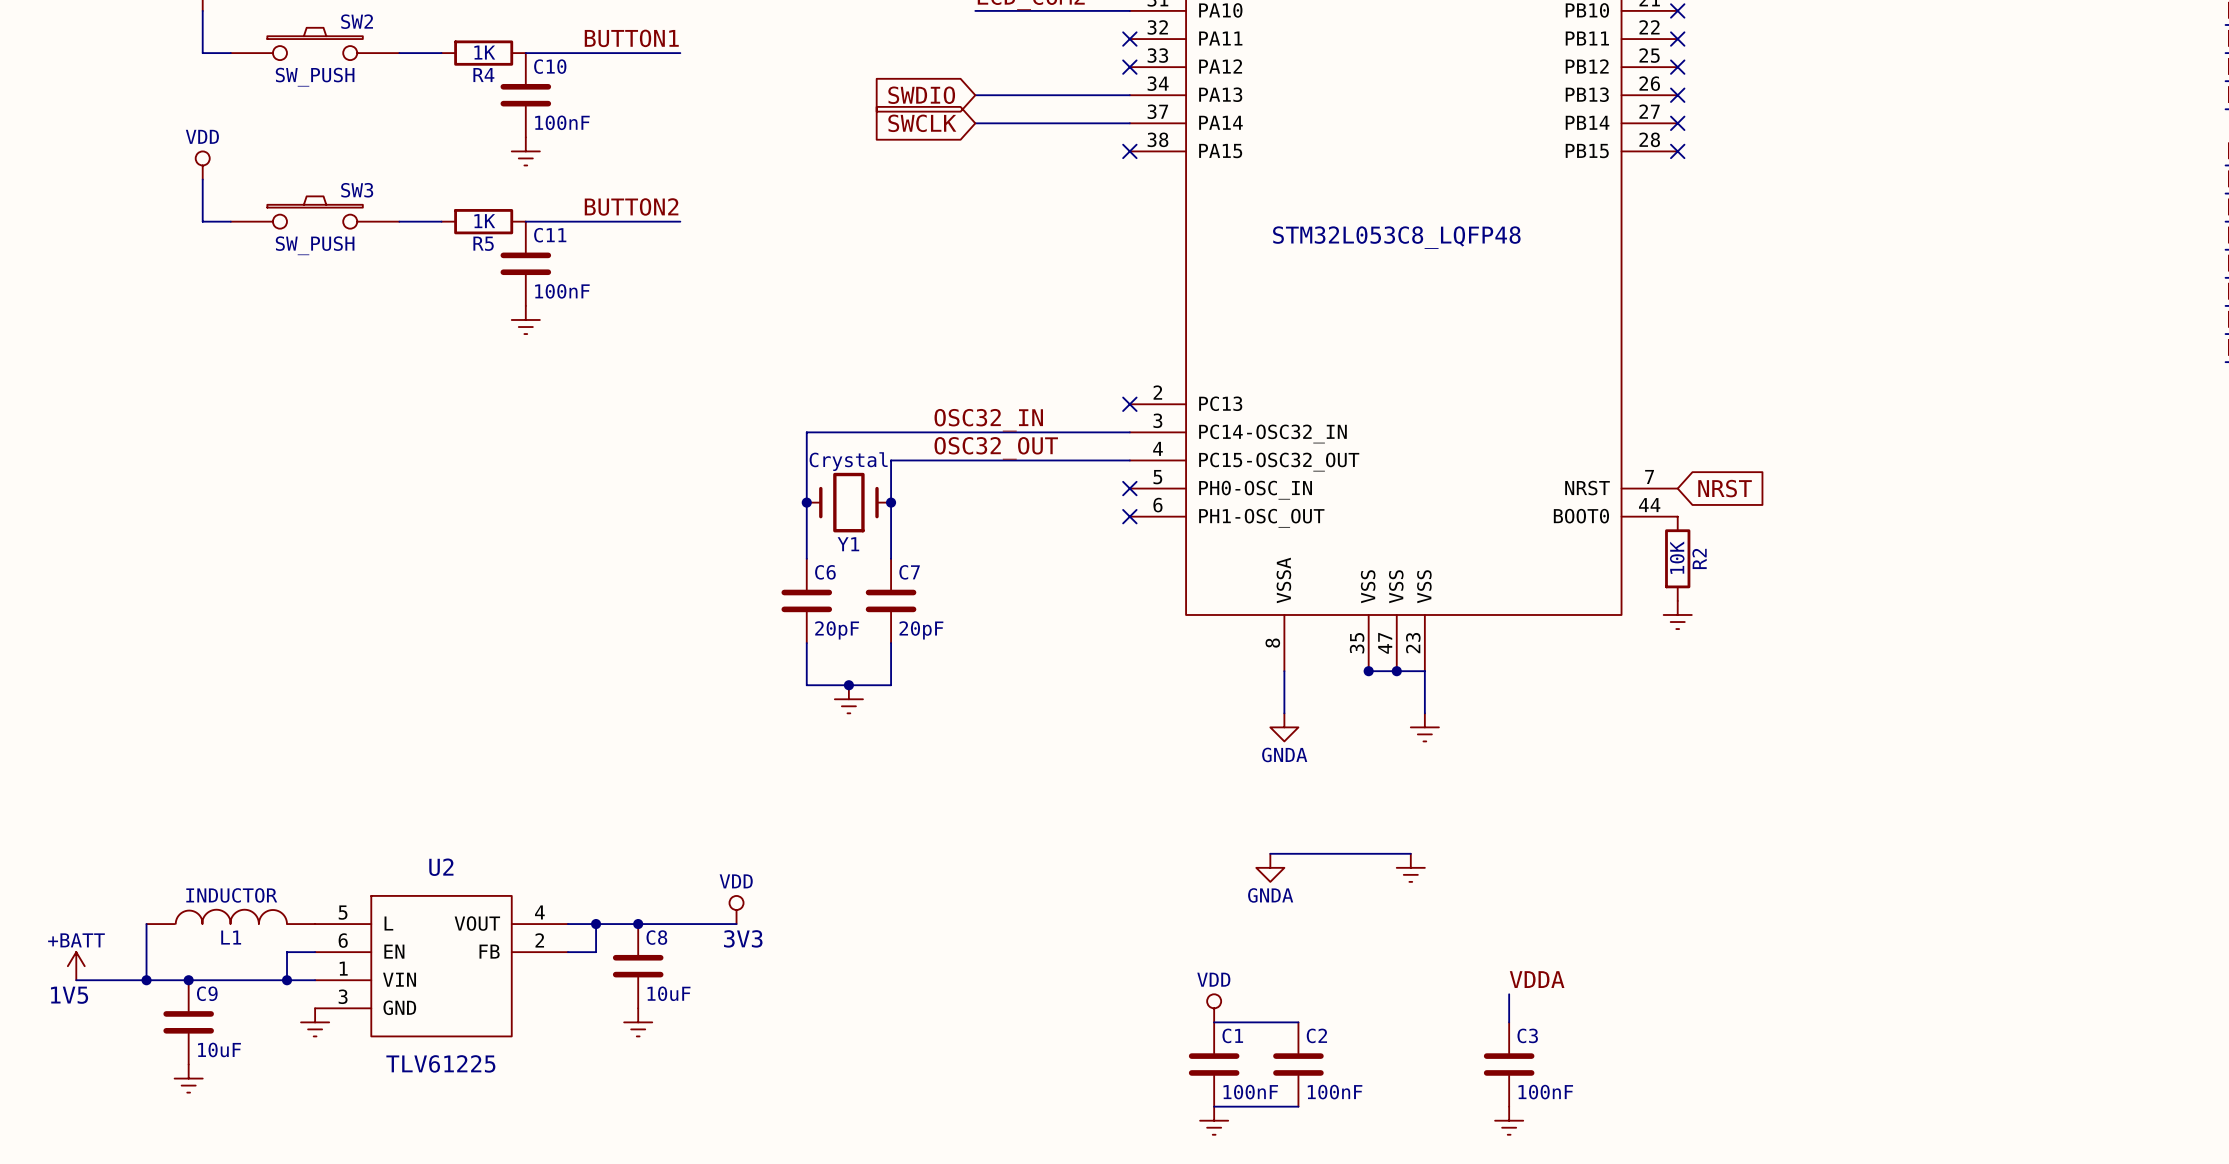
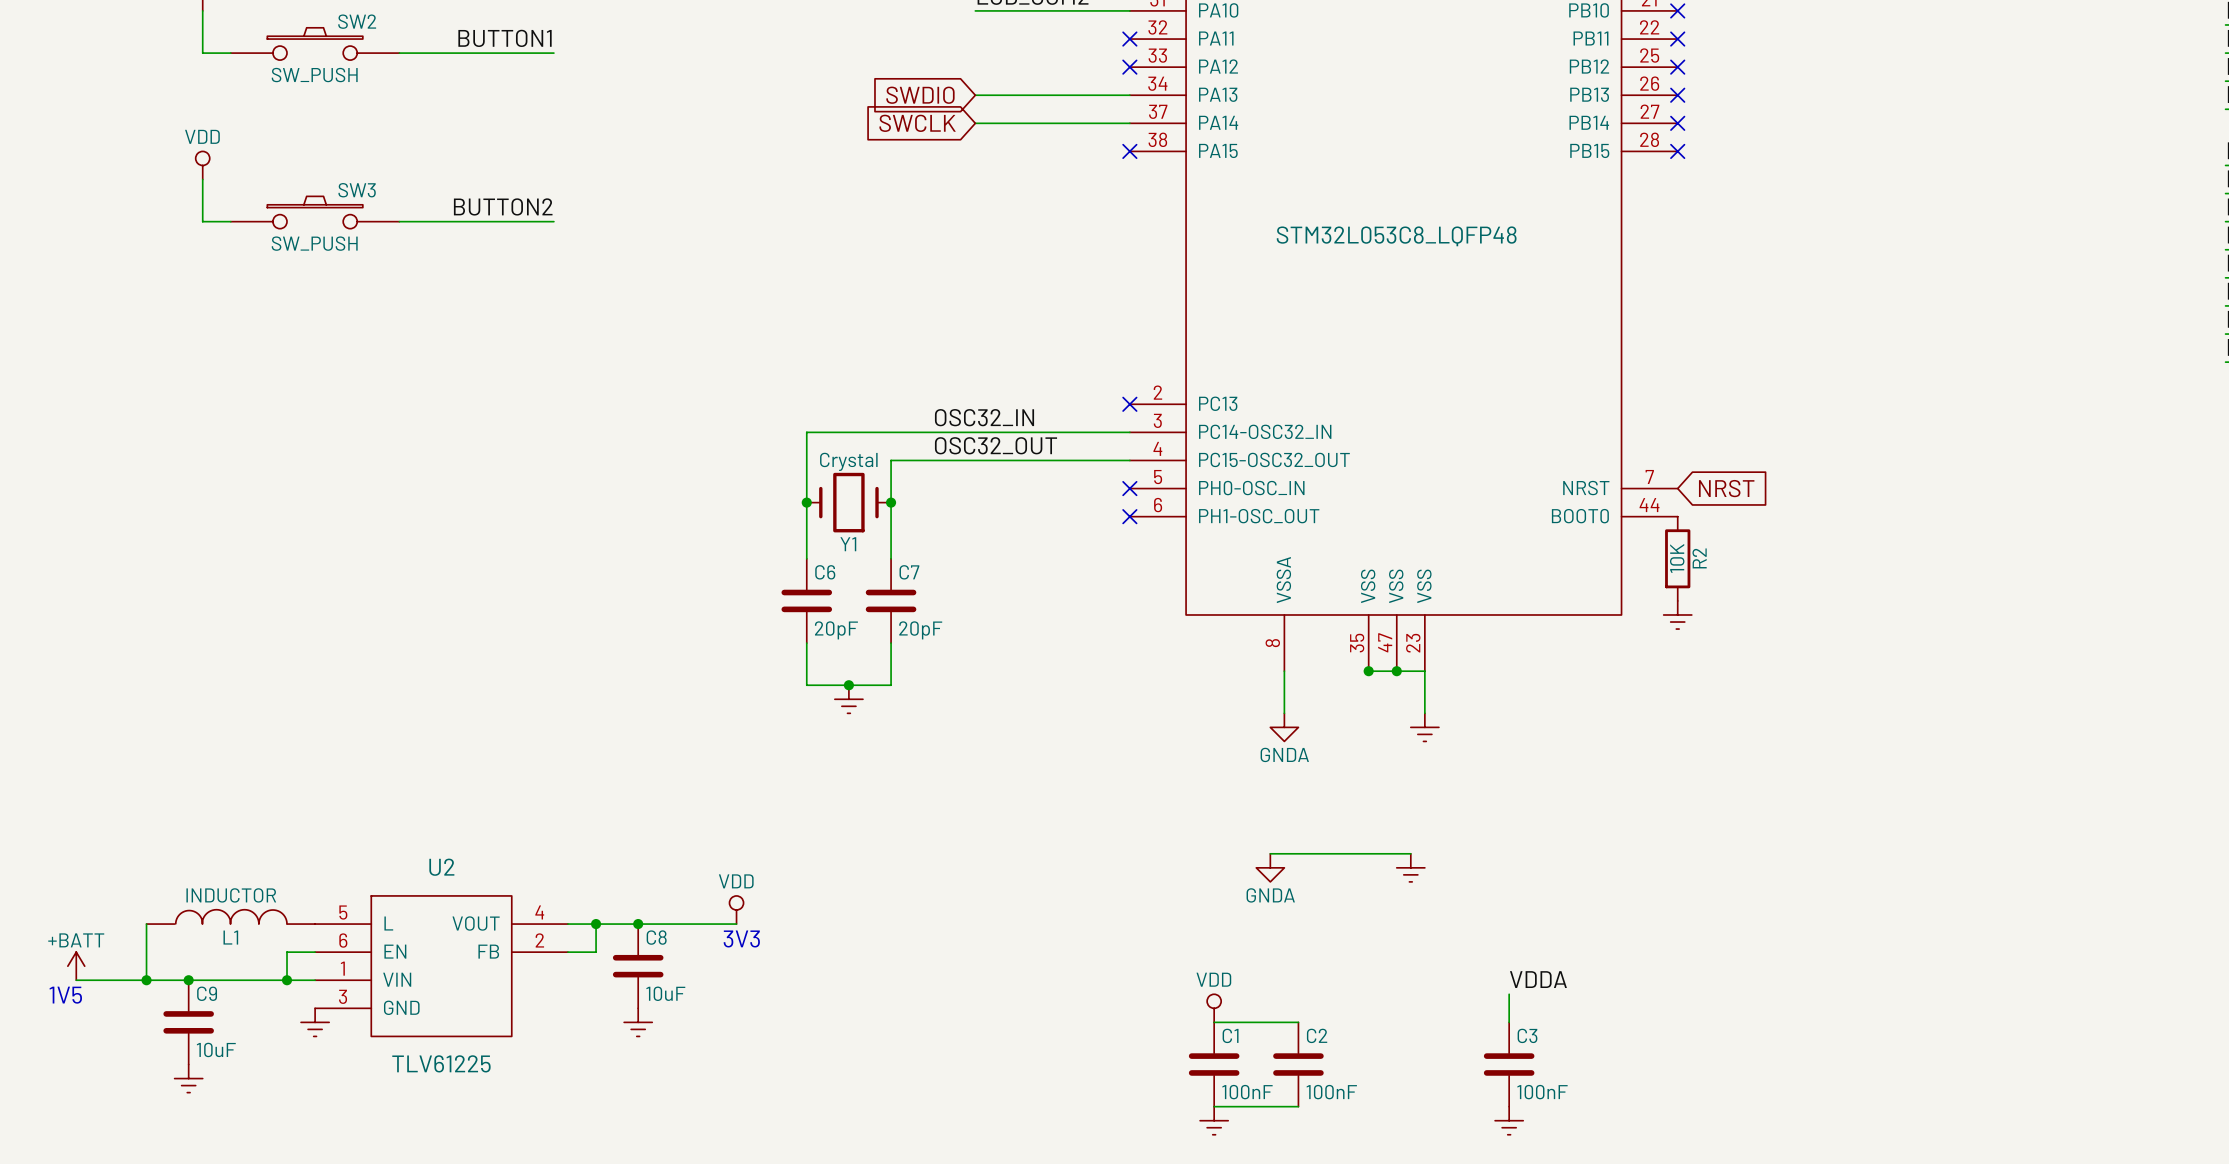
label position: BUTTON1 (631, 38) -> BUTTON1 (505, 38)
wire: none -> (441, 53) (525, 53)
R4: 1K (483, 53) -> none
wire: (553, 53) (680, 53) -> none
C10: 100nF (525, 95) -> none
power symbol: (525, 151) -> none
label position: BUTTON2 (631, 206) -> BUTTON2 (503, 206)
wire: none -> (441, 221) (525, 221)
R5: 1K (483, 221) -> none
wire: (553, 221) (680, 221) -> none
C11: 100nF (525, 263) -> none
power symbol: (525, 319) -> none

